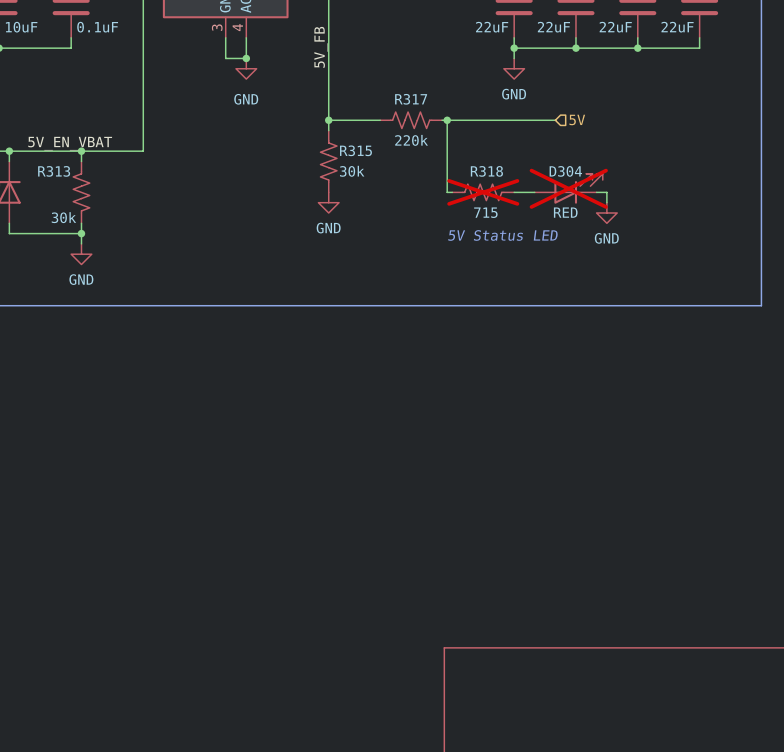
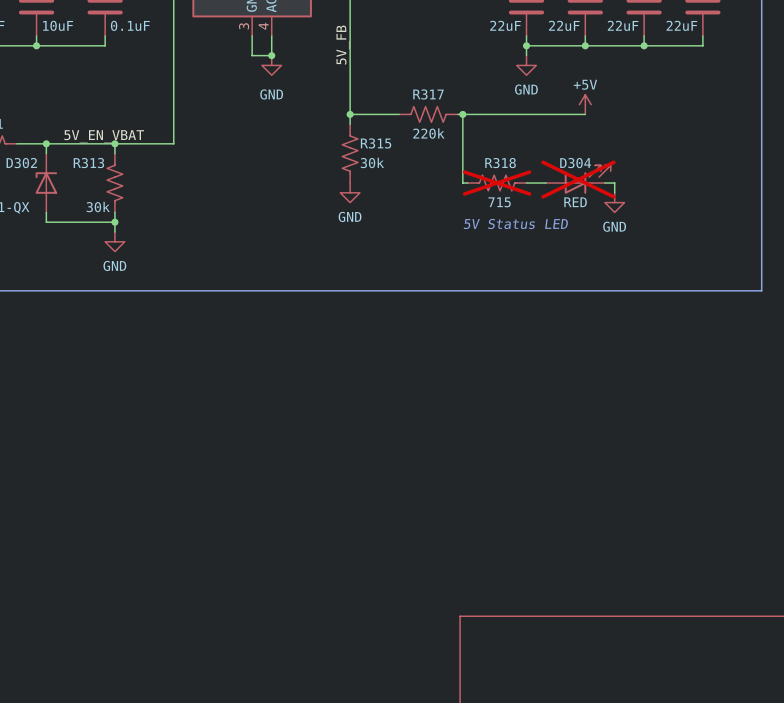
power symbol: none -> +5V (585, 104)
hierarchical label: 5V (577, 119) -> none
wire: none -> (565, 114) (585, 114)

